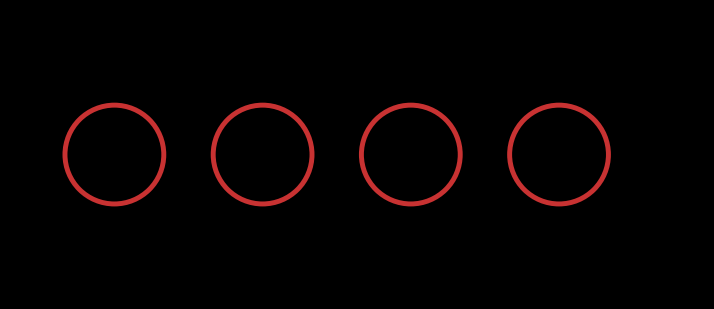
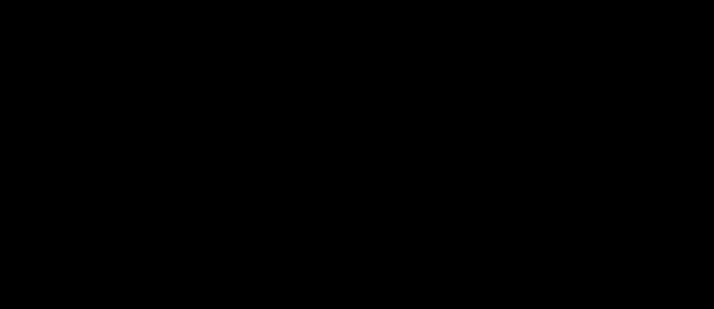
part: (114, 154) -> none
part: (262, 154) -> none
part: (410, 154) -> none
part: (559, 154) -> none

